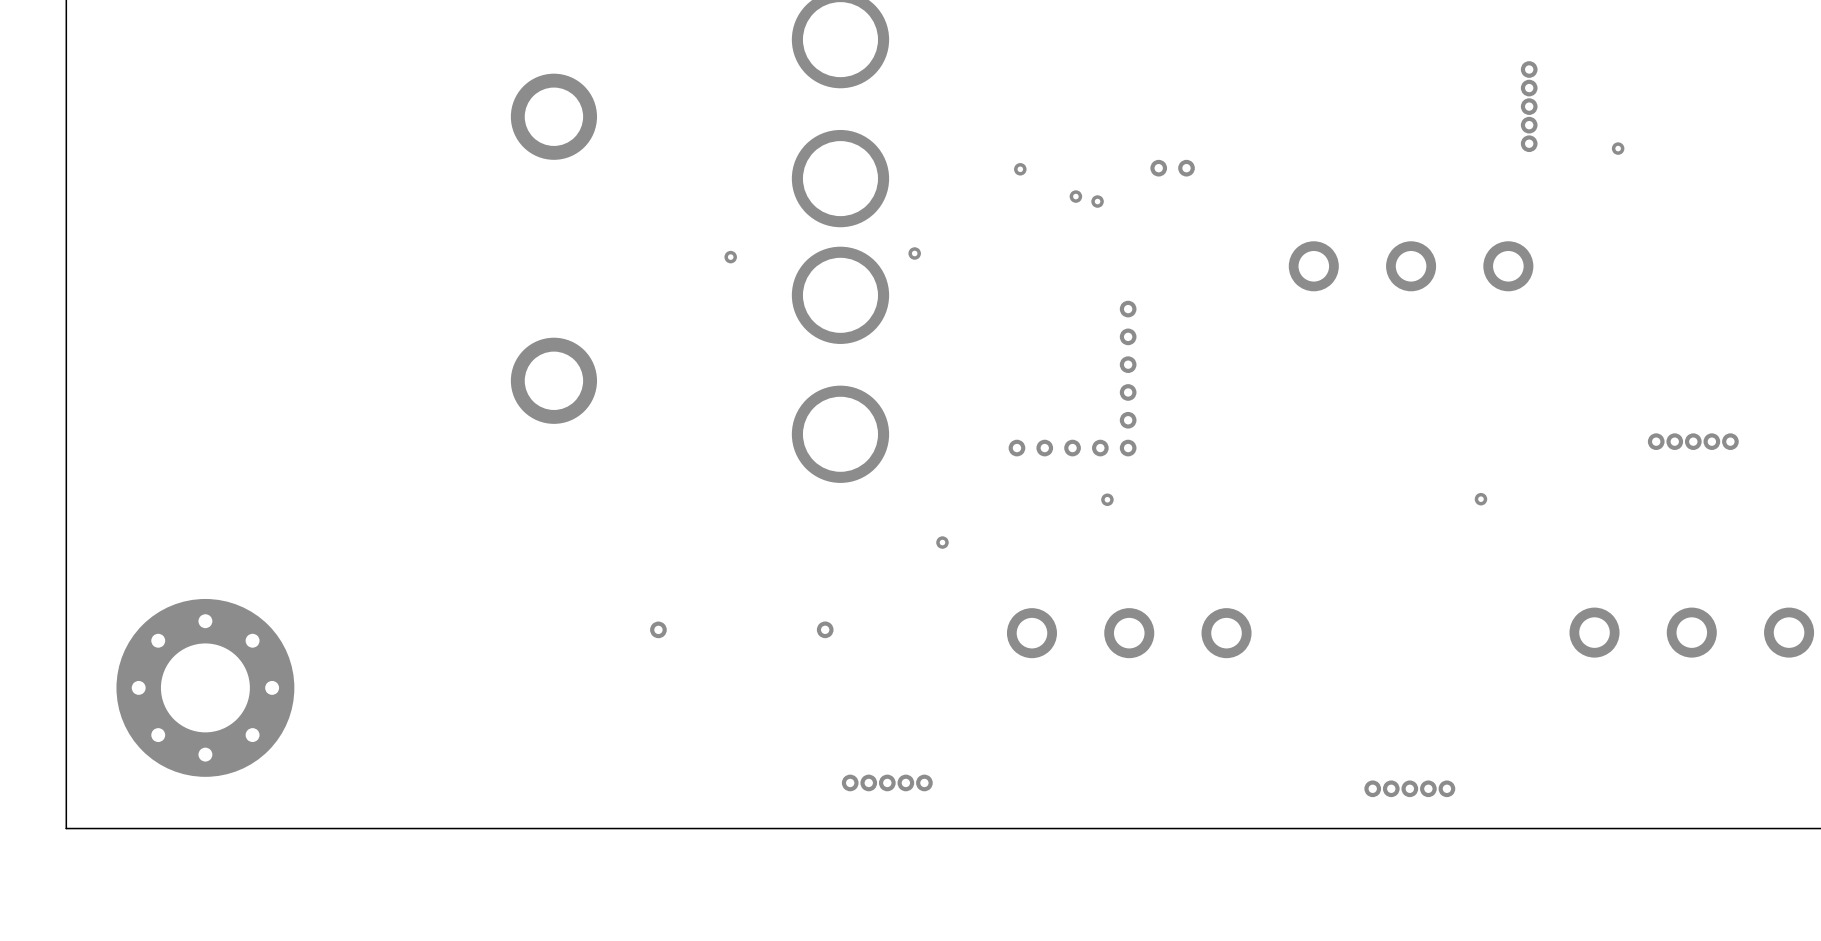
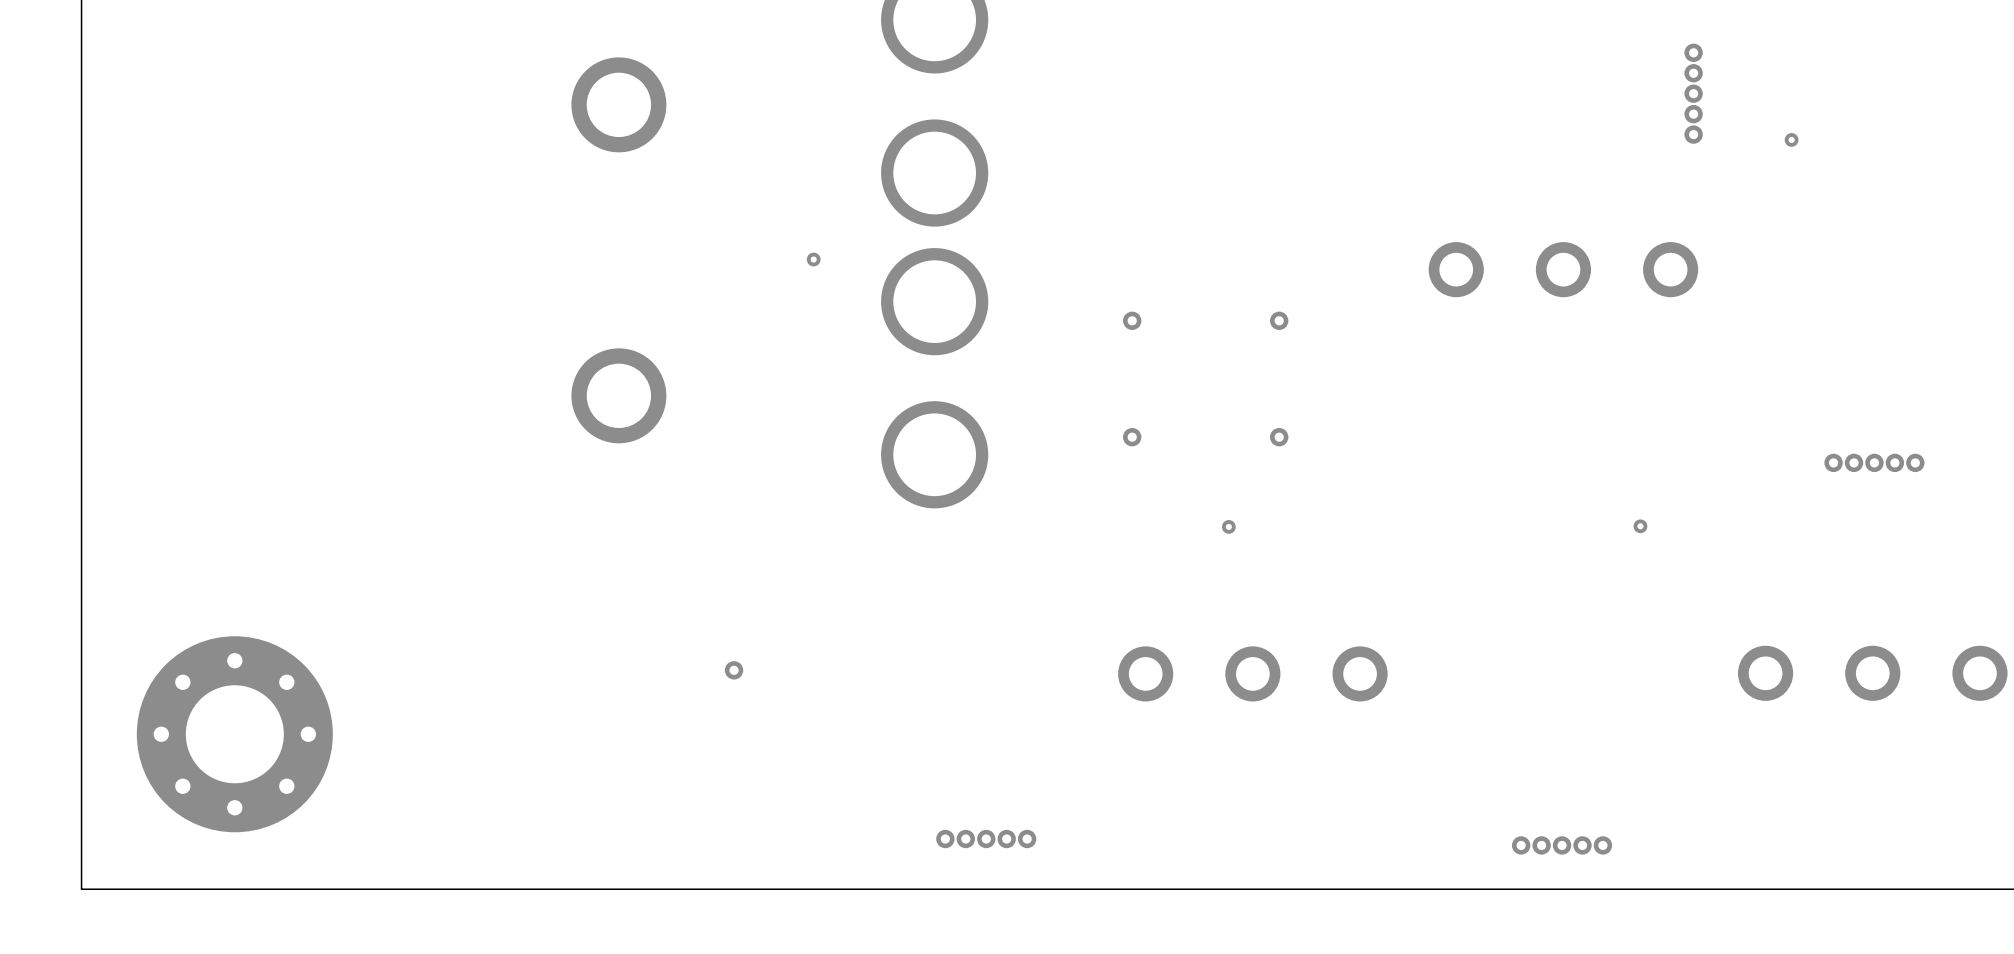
via: (1158, 168) -> none
via: (1186, 168) -> none
via: (1020, 169) -> none
via: (1075, 196) -> none
via: (1097, 201) -> none
via: (914, 253) -> none
via: (1128, 309) -> none
via: none -> (1132, 320)
via: none -> (1279, 320)
via: (1128, 336) -> none
via: (1128, 364) -> none
via: (1128, 392) -> none
via: none -> (1132, 437)
via: none -> (1279, 437)
via: (1128, 420) -> none
via: (1016, 448) -> none
via: (1044, 448) -> none
via: (1072, 448) -> none
via: (1100, 448) -> none
via: (1128, 448) -> none
via: (942, 542) -> none
via: (825, 629) -> none

